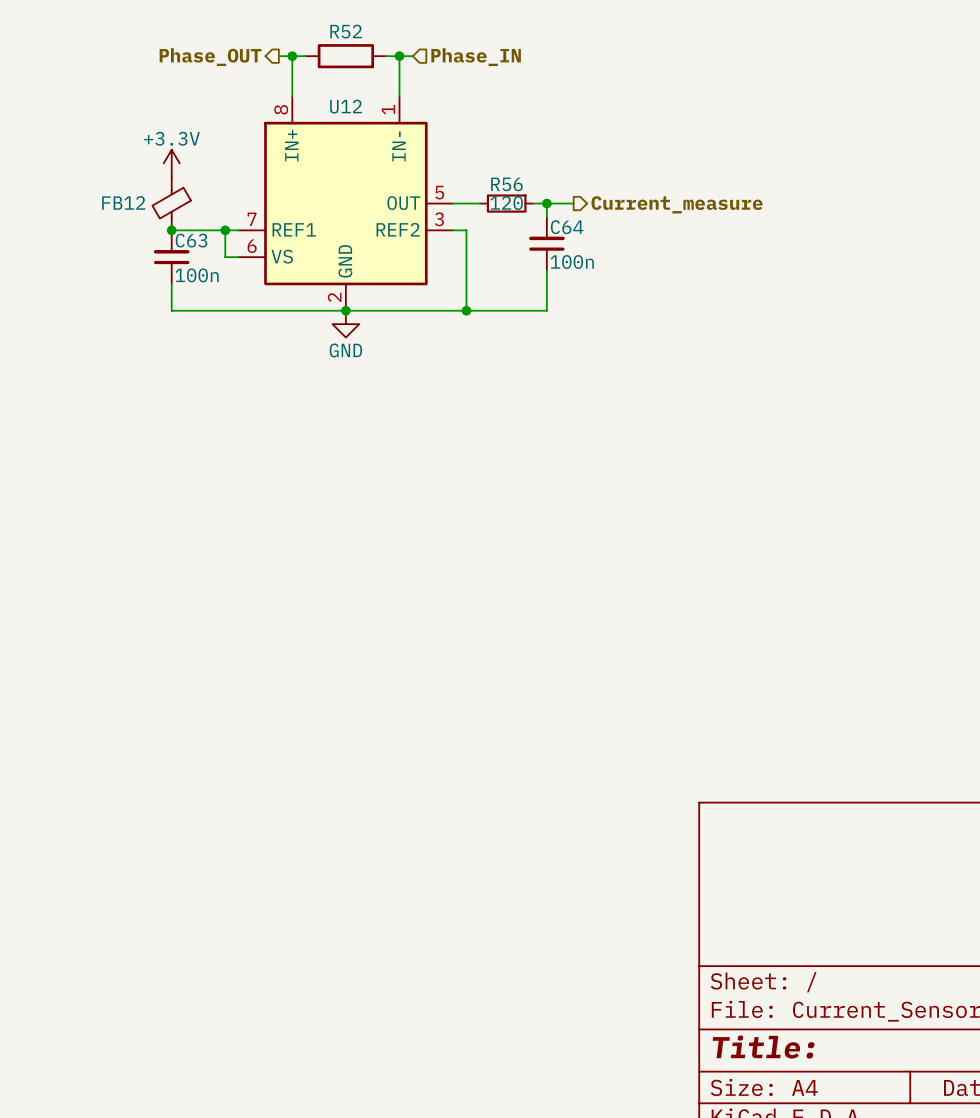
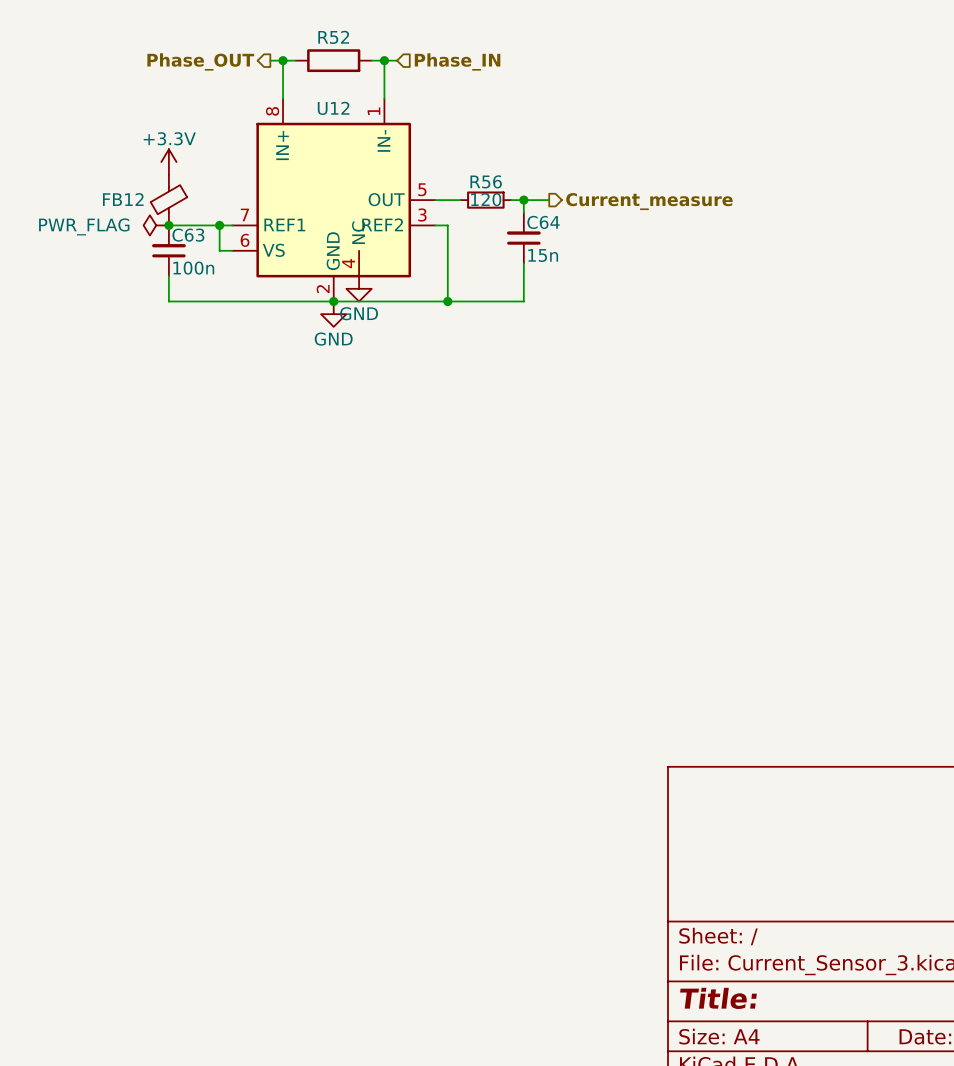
U12 symbol: [238, 96, 454, 311] -> [232, 98, 436, 302]
power symbol: none -> PWR_FLAG (156, 225)
C64 value: 100n (572, 262) -> 15n (543, 255)
power symbol: none -> GND (359, 288)

